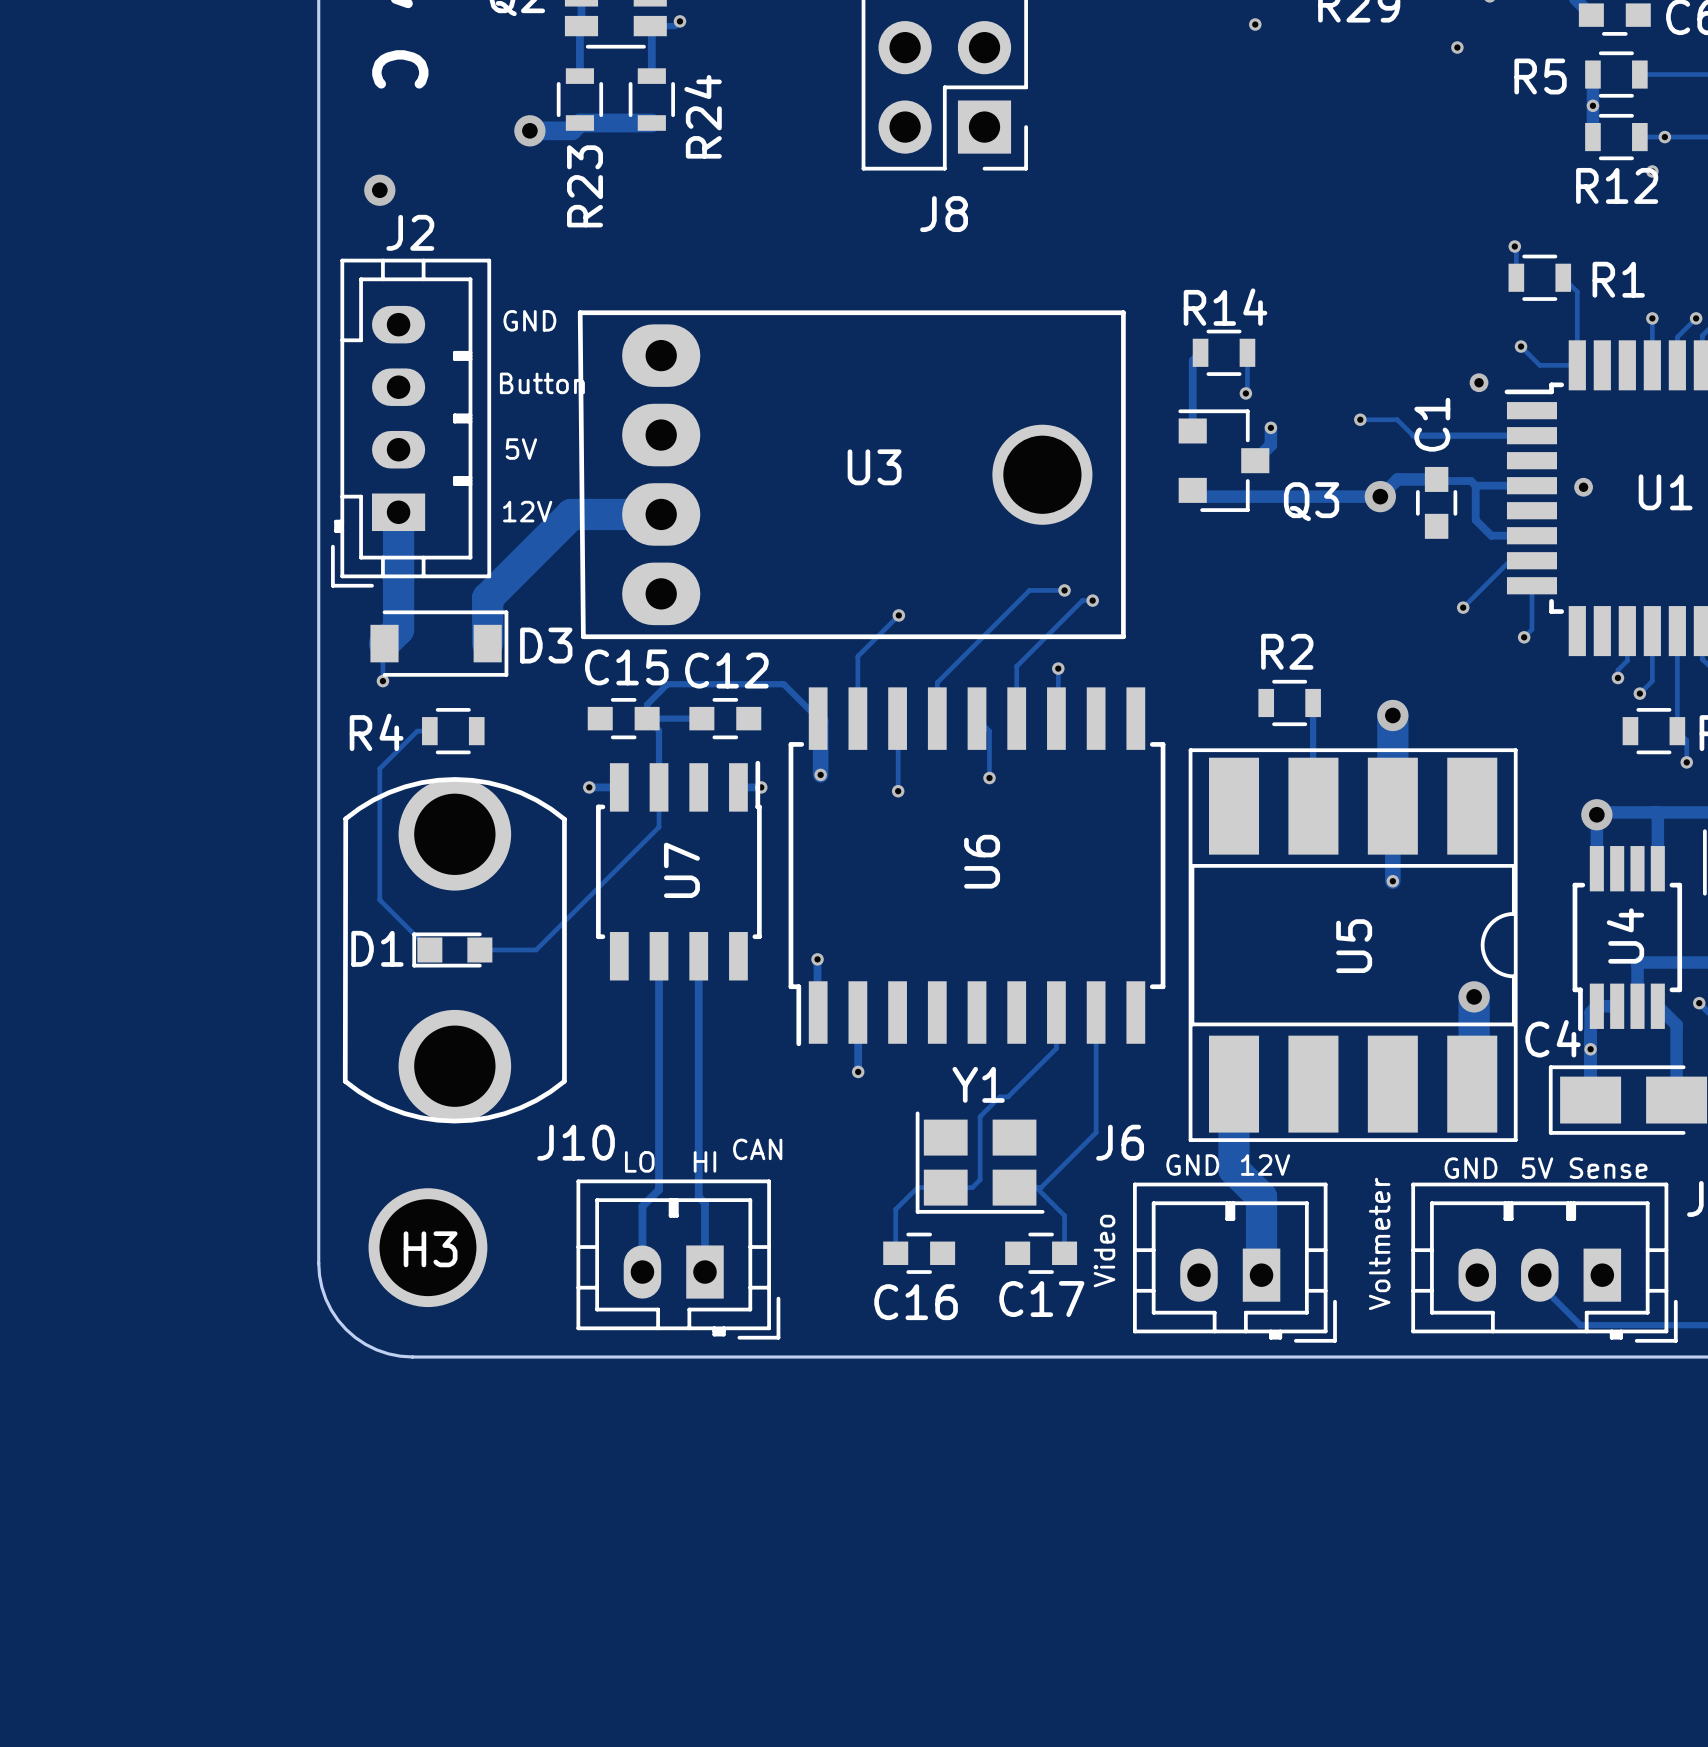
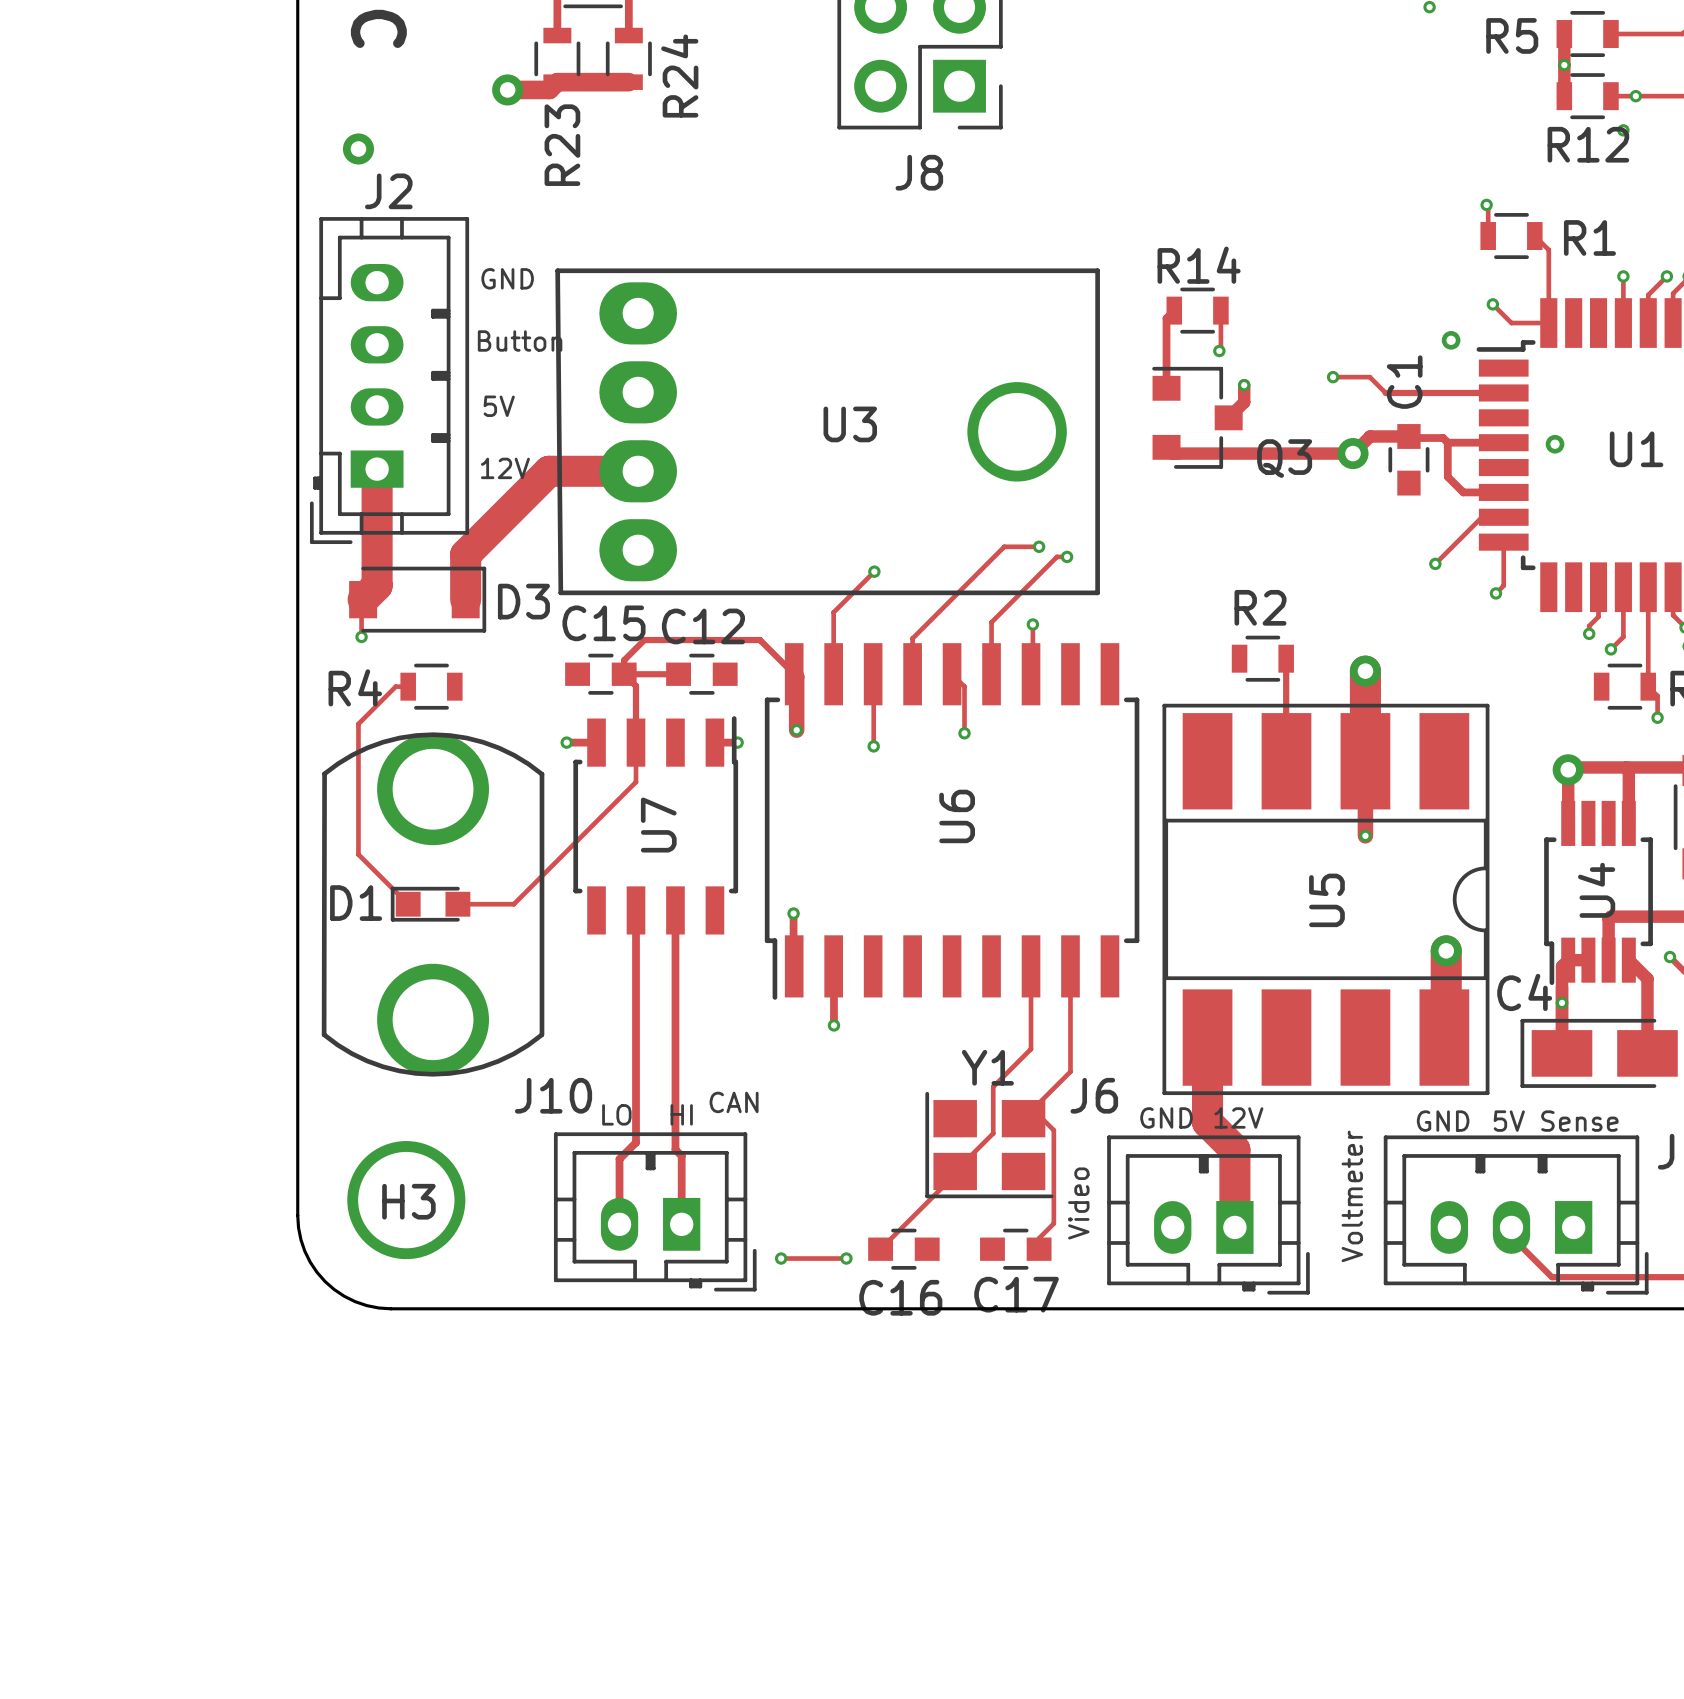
track: (1056, 1048) (1007, 1096) (999, 1096) (980, 1116) (980, 1179) (972, 1187) (917, 1187) (895, 1209) (895, 1253) -> (1031, 1002) (1031, 1049) (993, 1086) (993, 1133) (880, 1249)
Y1 footprint: [915, 1111, 1045, 1214] -> [925, 1091, 1054, 1199]
track: (1096, 1118) (1096, 1132) (1041, 1187) (1014, 1187) -> (1070, 1071) (1023, 1118) (1042, 1118) (1053, 1130) (1053, 1223) (1039, 1238) (1039, 1249)
track: (1036, 1187) (1064, 1215) (1064, 1253) -> none
C16 position: (919, 1253) -> (903, 1249)
C17 position: (1041, 1253) -> (1015, 1249)
track: none -> (781, 1258) (846, 1258)
via: none -> (781, 1258)
via: none -> (846, 1258)

